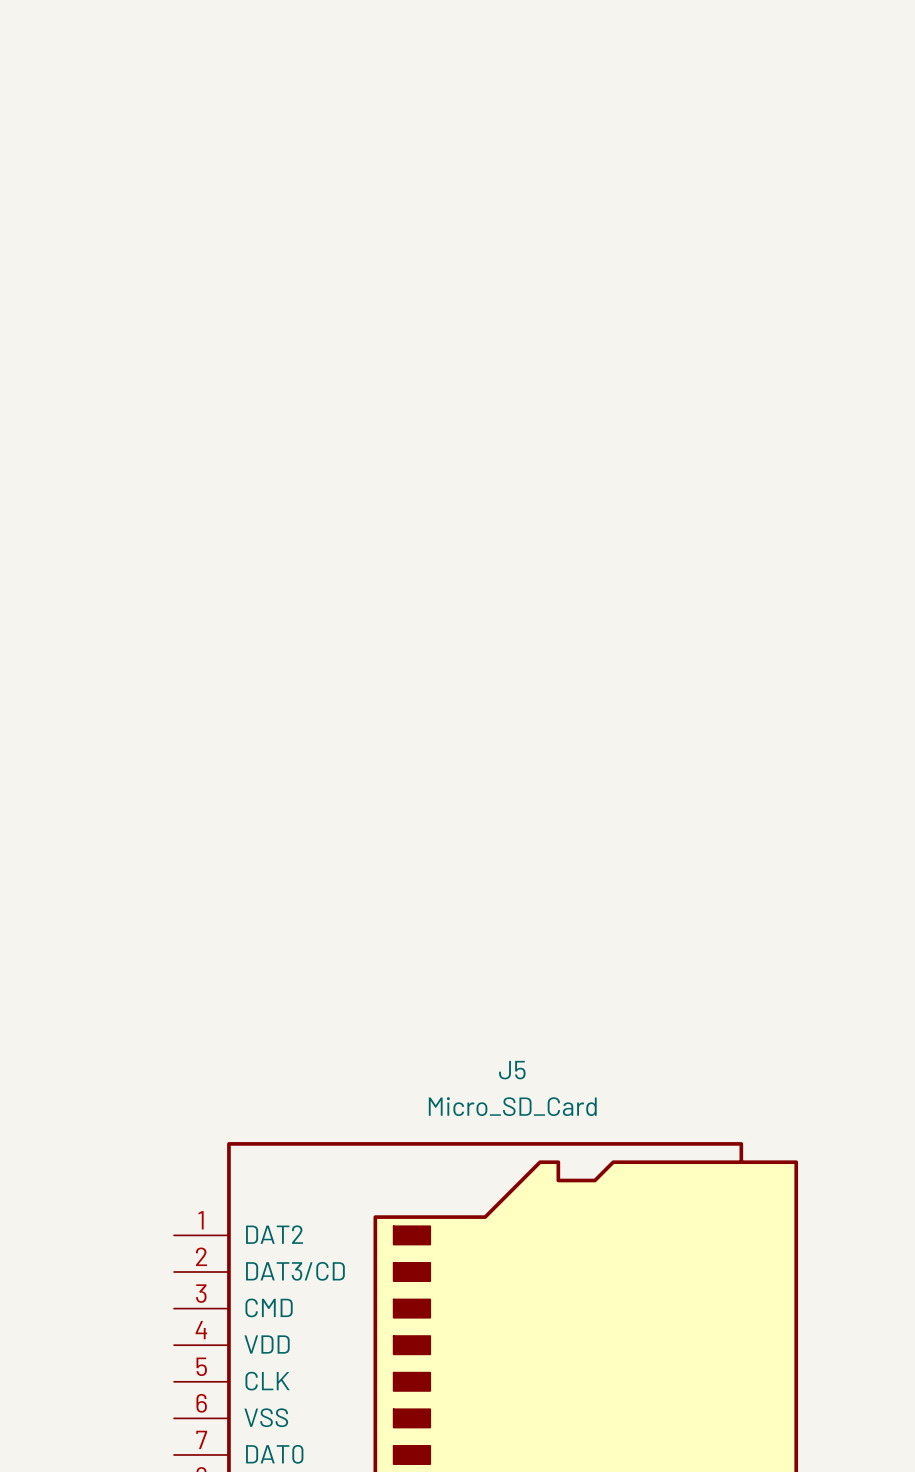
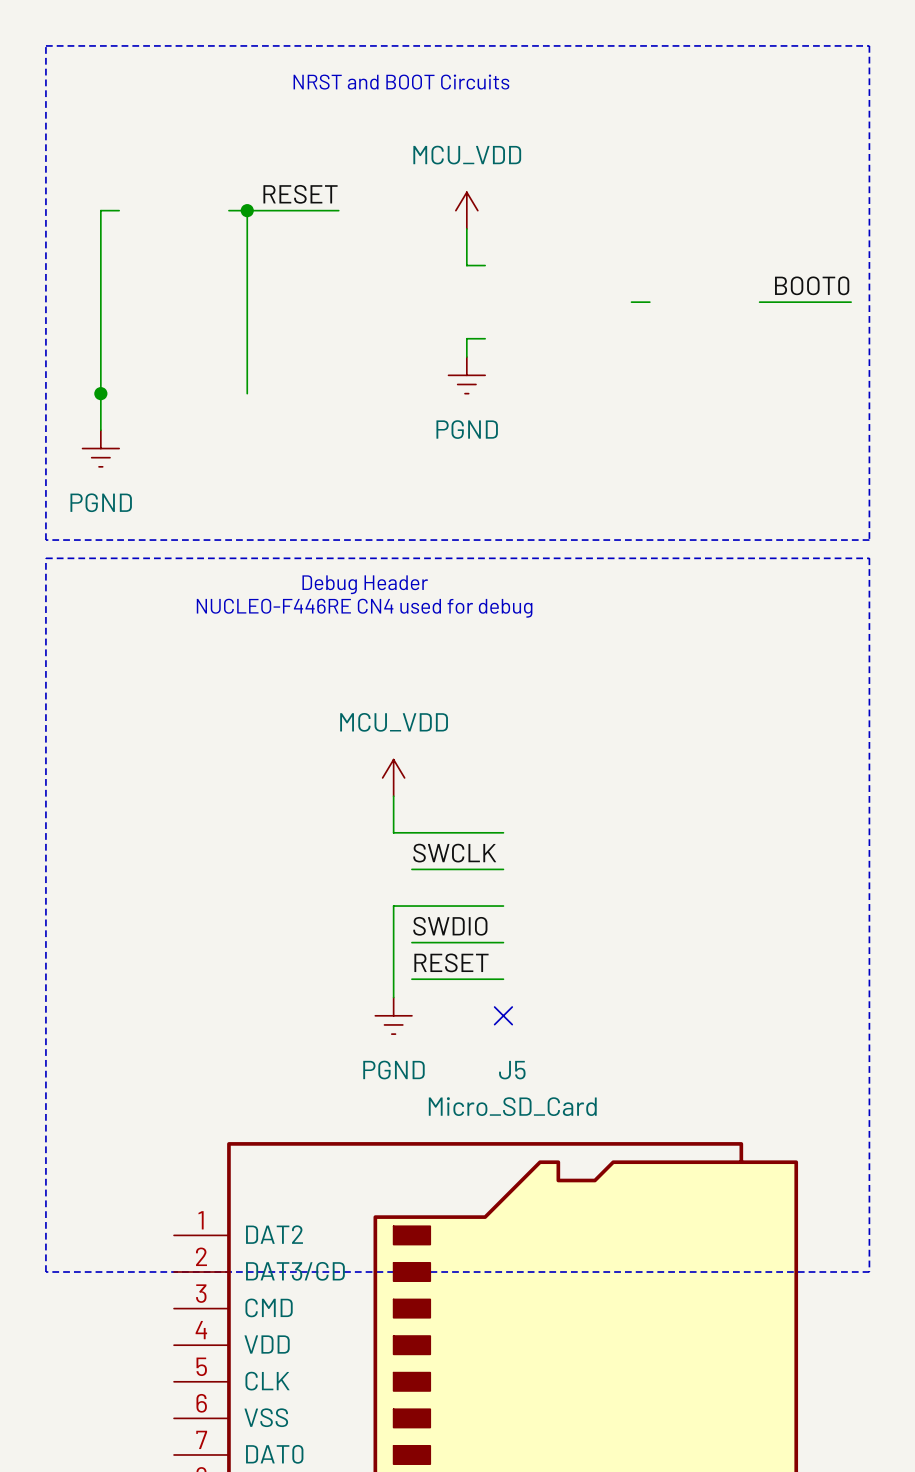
line: none -> (45, 45) (869, 45) (869, 540) (45, 540) (45, 45)
text: none -> NRST and BOOT Circuits (401, 82)
label: none -> RESET (300, 194)
wire: none -> (119, 210) (100, 210) (100, 430)
wire: none -> (228, 210) (338, 210)
wire: none -> (247, 210) (247, 393)
junction: none -> (247, 210)
power symbol: none -> MCU_VDD (466, 210)
wire: none -> (466, 228) (466, 265) (485, 265)
label: none -> BOOT0 (812, 285)
wire: none -> (631, 302) (649, 302)
wire: none -> (759, 302) (851, 302)
wire: none -> (485, 338) (466, 338) (466, 357)
power symbol: none -> PGND (466, 375)
junction: none -> (100, 393)
power symbol: none -> PGND (100, 448)
line: none -> (45, 558) (45, 1272) (869, 1272) (869, 558) (45, 558)
text: none -> Debug Header (365, 584)
text: none -> NUCLEO-F446RE CN4 used for debug (364, 608)
power symbol: none -> MCU_VDD (393, 777)
wire: none -> (393, 796) (393, 832) (503, 832)
label: none -> SWCLK (454, 853)
wire: none -> (411, 869) (503, 869)
wire: none -> (503, 906) (393, 906) (393, 997)
label: none -> SWDIO (450, 926)
wire: none -> (411, 942) (503, 942)
label: none -> RESET (451, 962)
wire: none -> (411, 979) (503, 979)
power symbol: none -> PGND (393, 1015)
no-connect mark: none -> (503, 1015)

